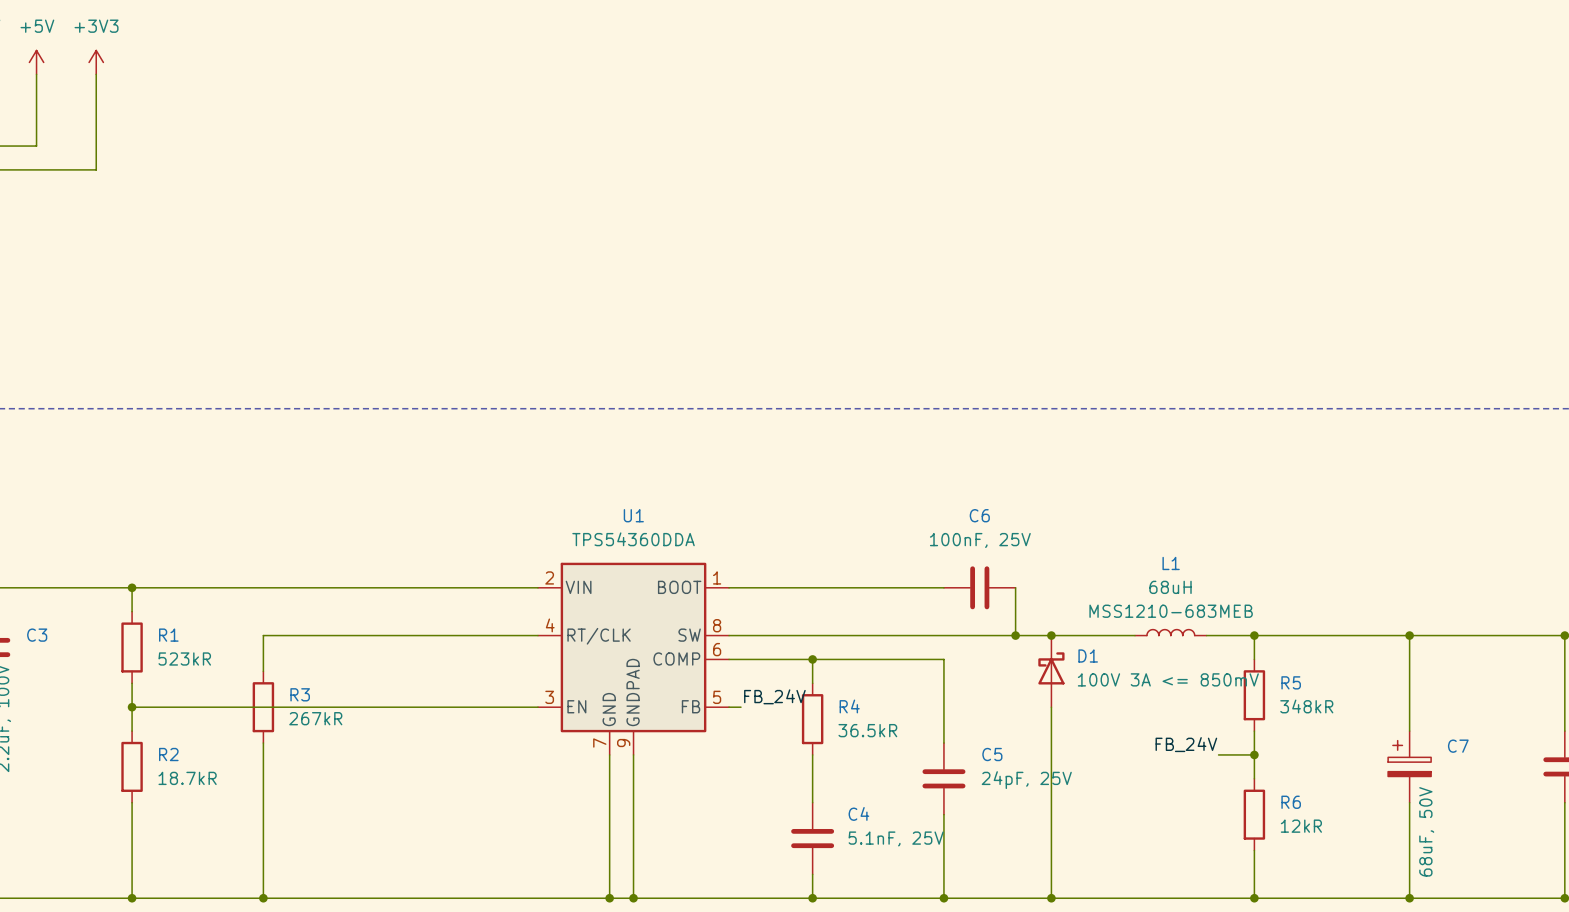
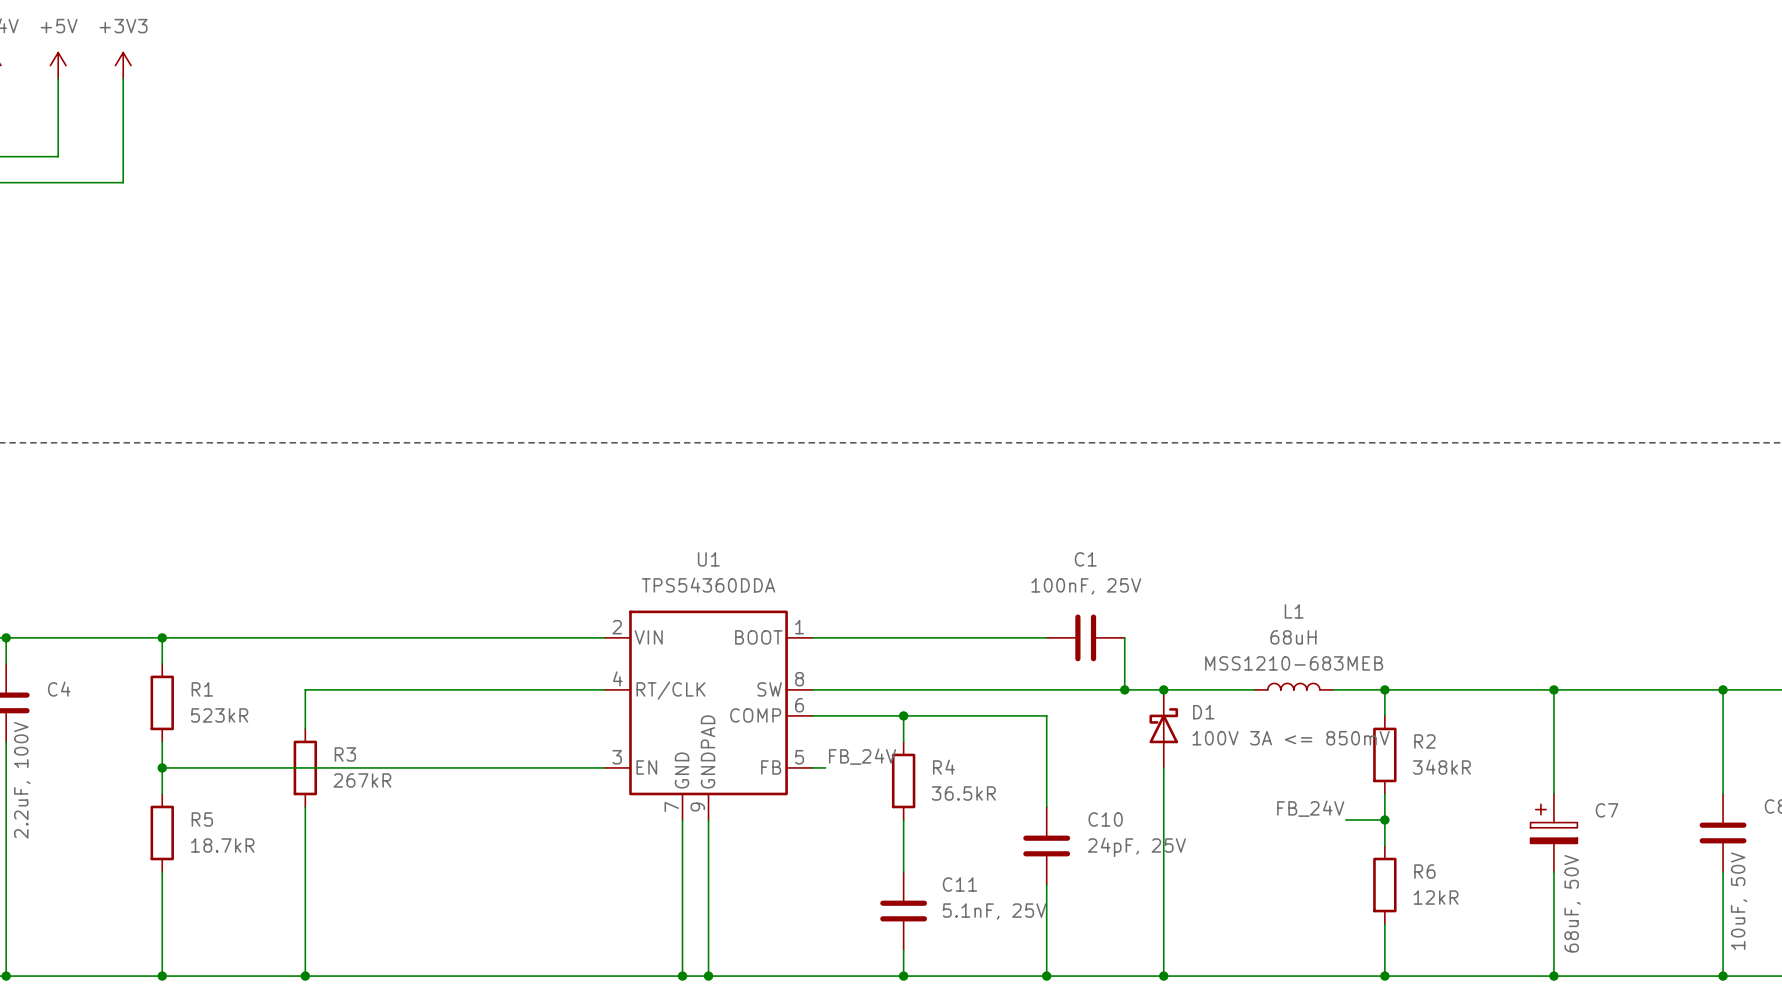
C6 name: C6 (979, 515) -> C1 (1085, 559)
C3 name: C3 (37, 635) -> C4 (59, 689)
R5 name: R5 (1291, 682) -> R2 (1424, 741)
R2 name: R2 (168, 754) -> R5 (202, 819)
C5 name: C5 (992, 754) -> C10 (1105, 819)
C4 name: C4 (858, 813) -> C11 (959, 884)

